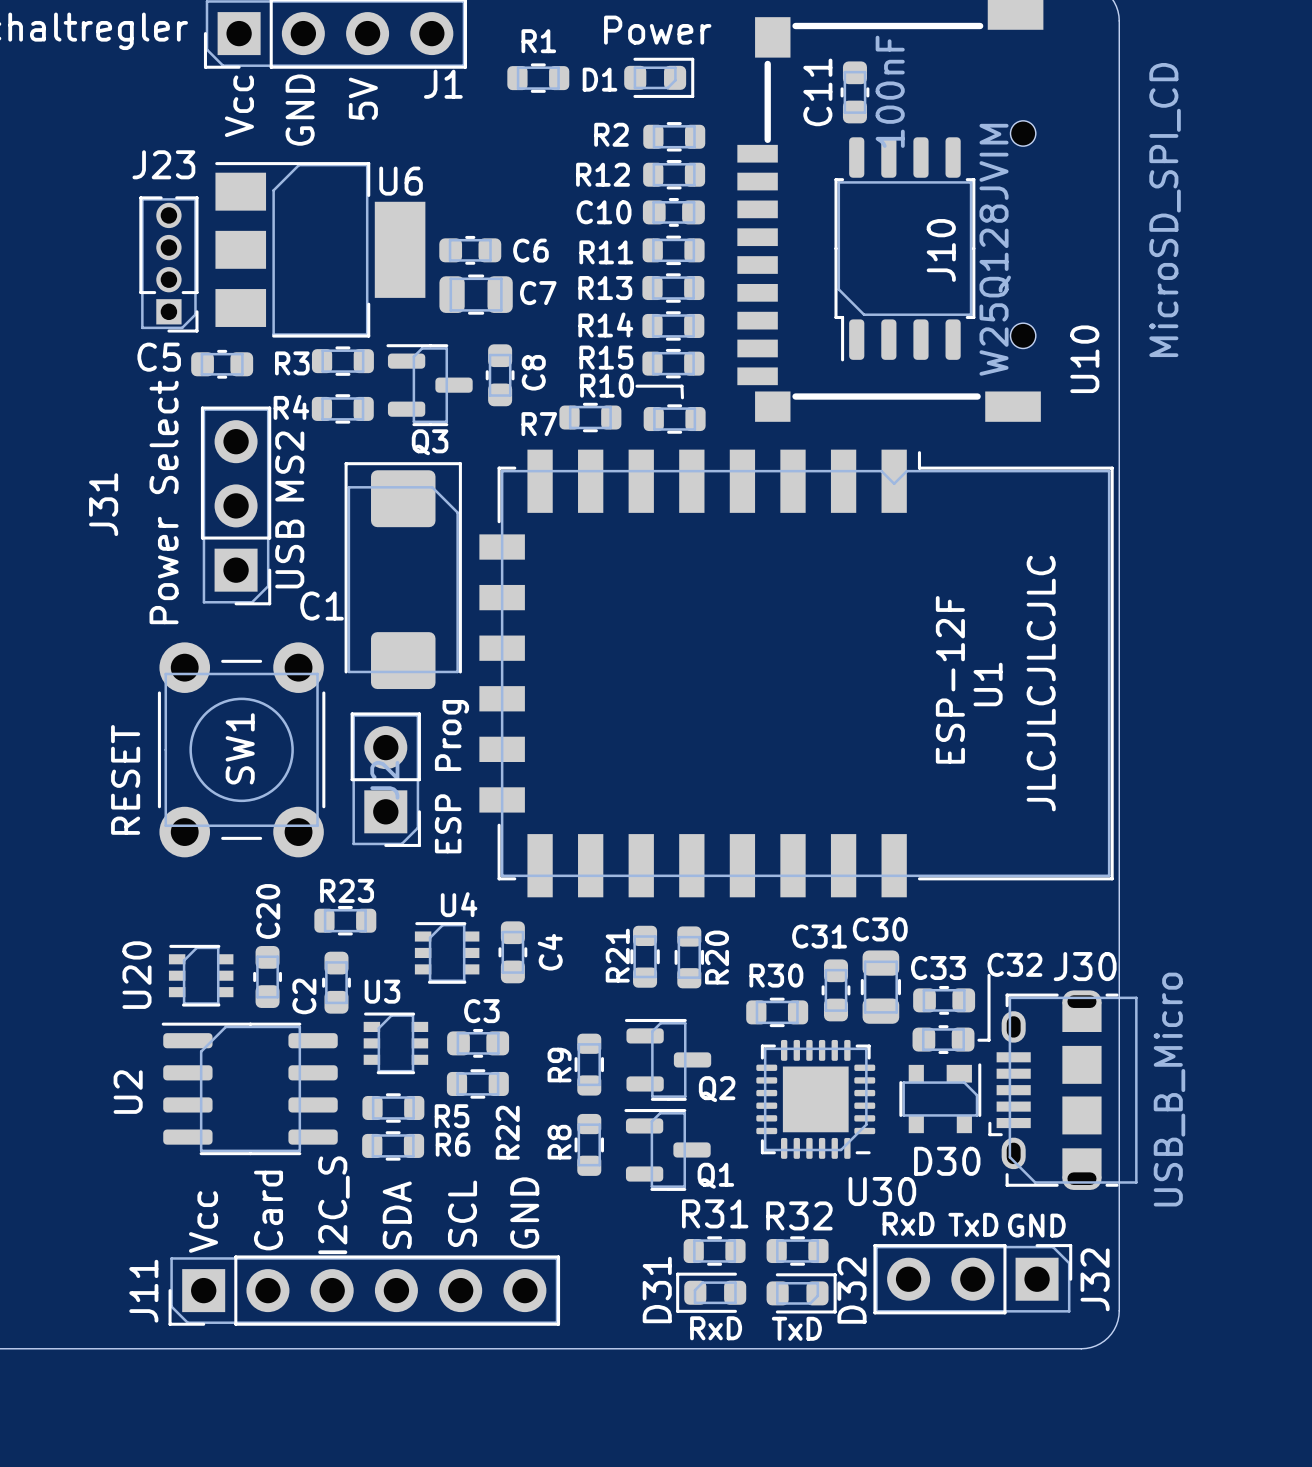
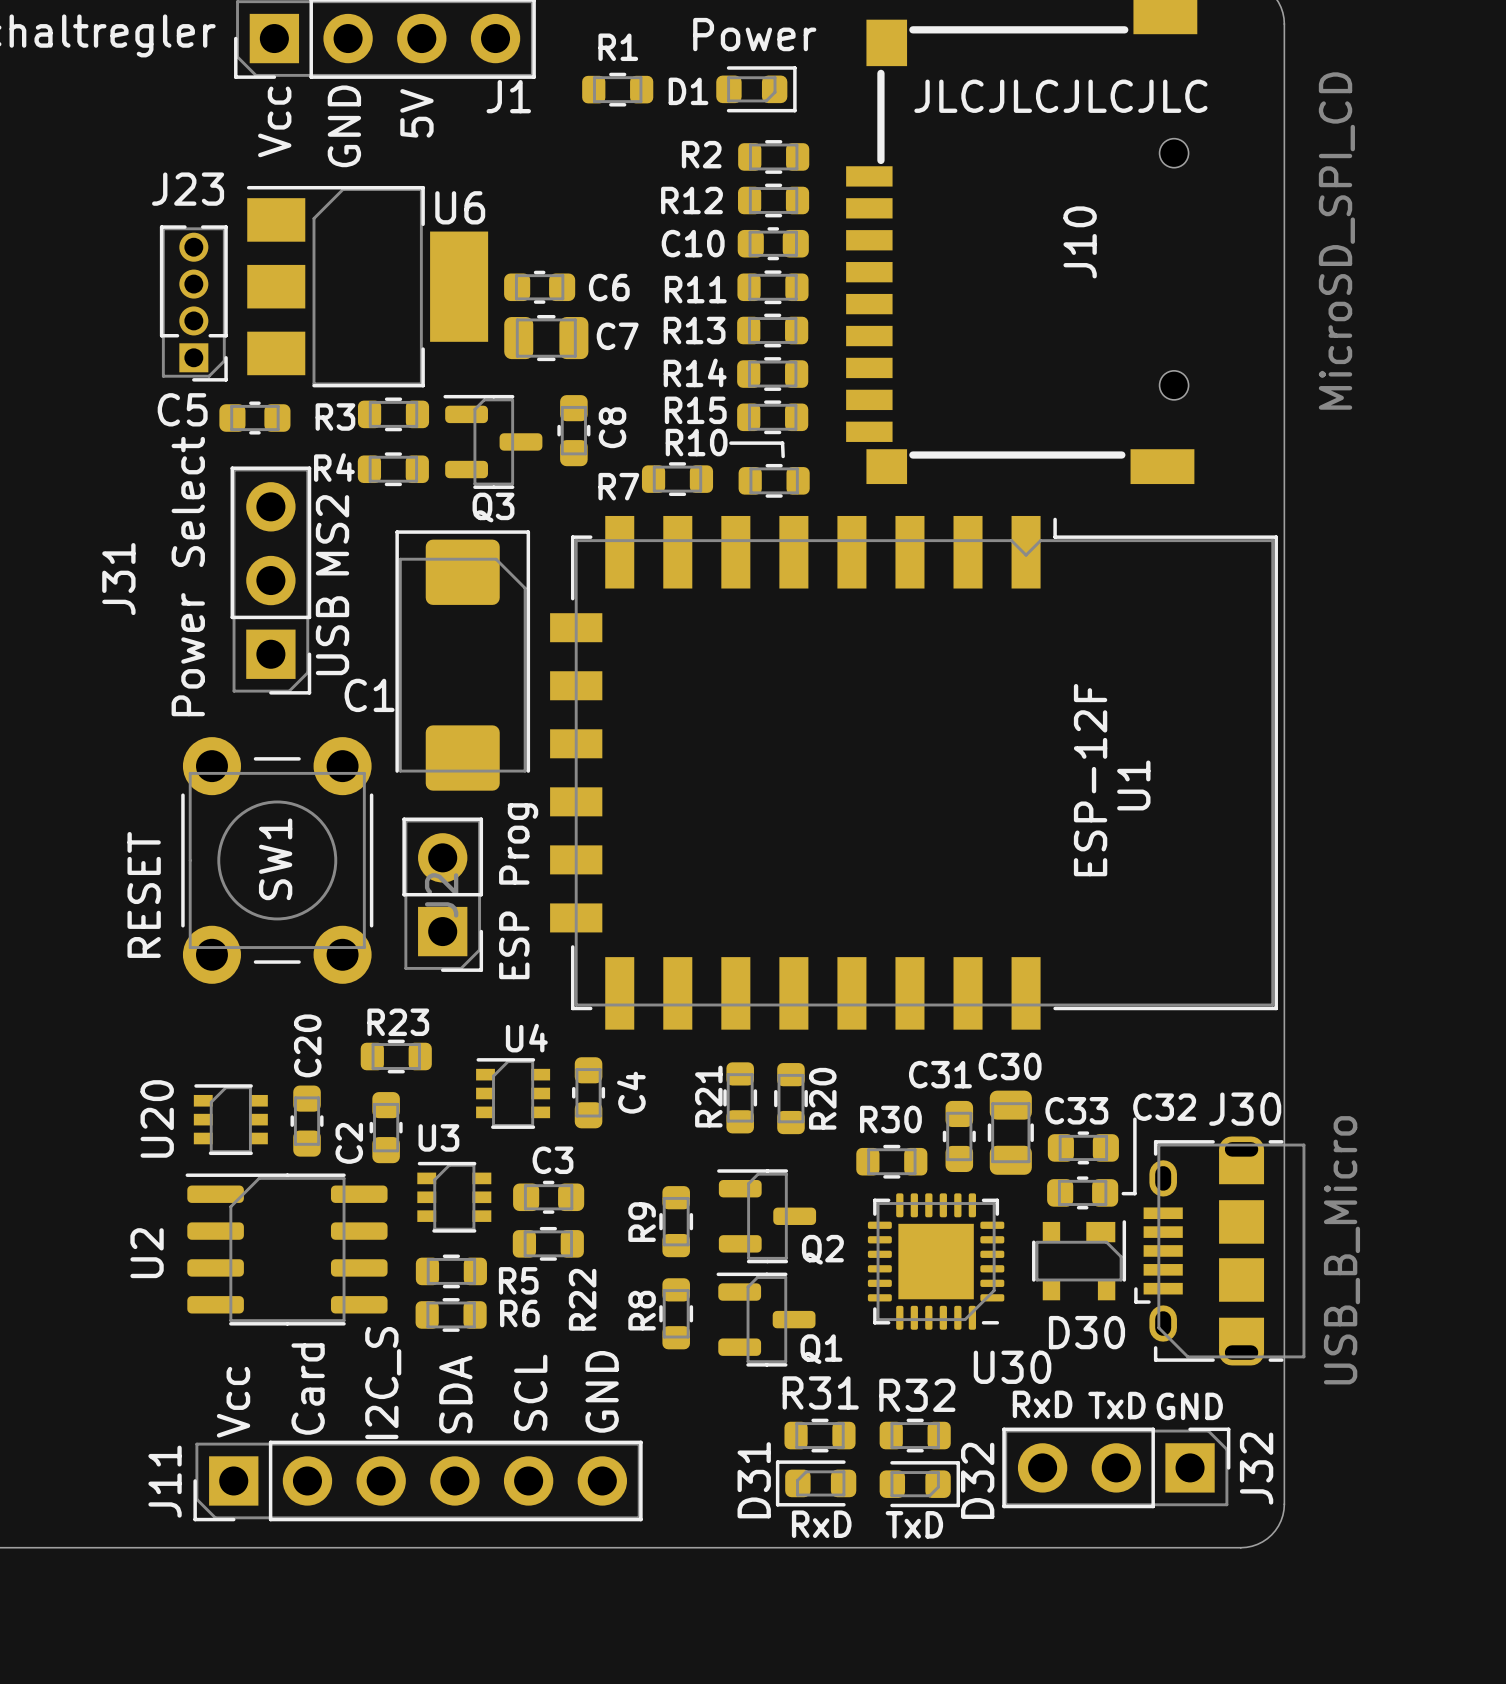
C11: 100nF (854, 92) -> none
U10: W25Q128JVIM (904, 249) -> none
J10 name position: J10 (941, 250) -> J10 (1080, 242)
text rotation: 0° (1041, 683) -> 90° clockwise (1060, 96)
text position: JLCJLCJLCJLC (1041, 683) -> JLCJLCJLCJLC (1060, 96)

